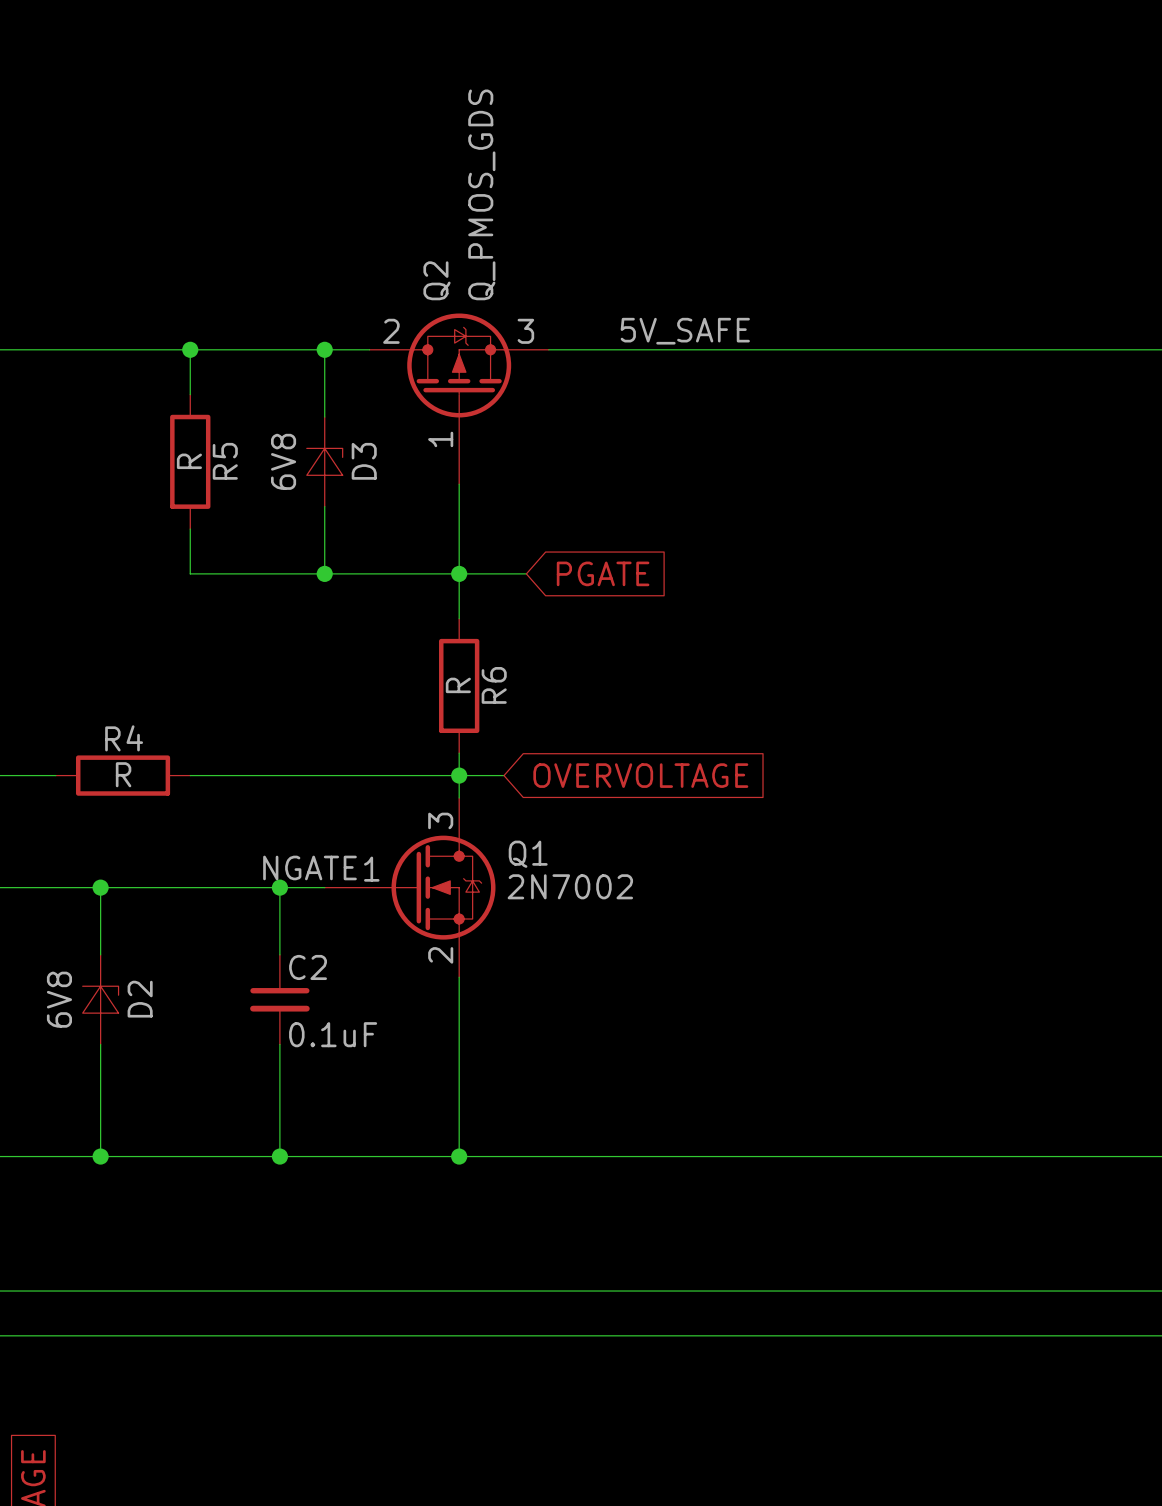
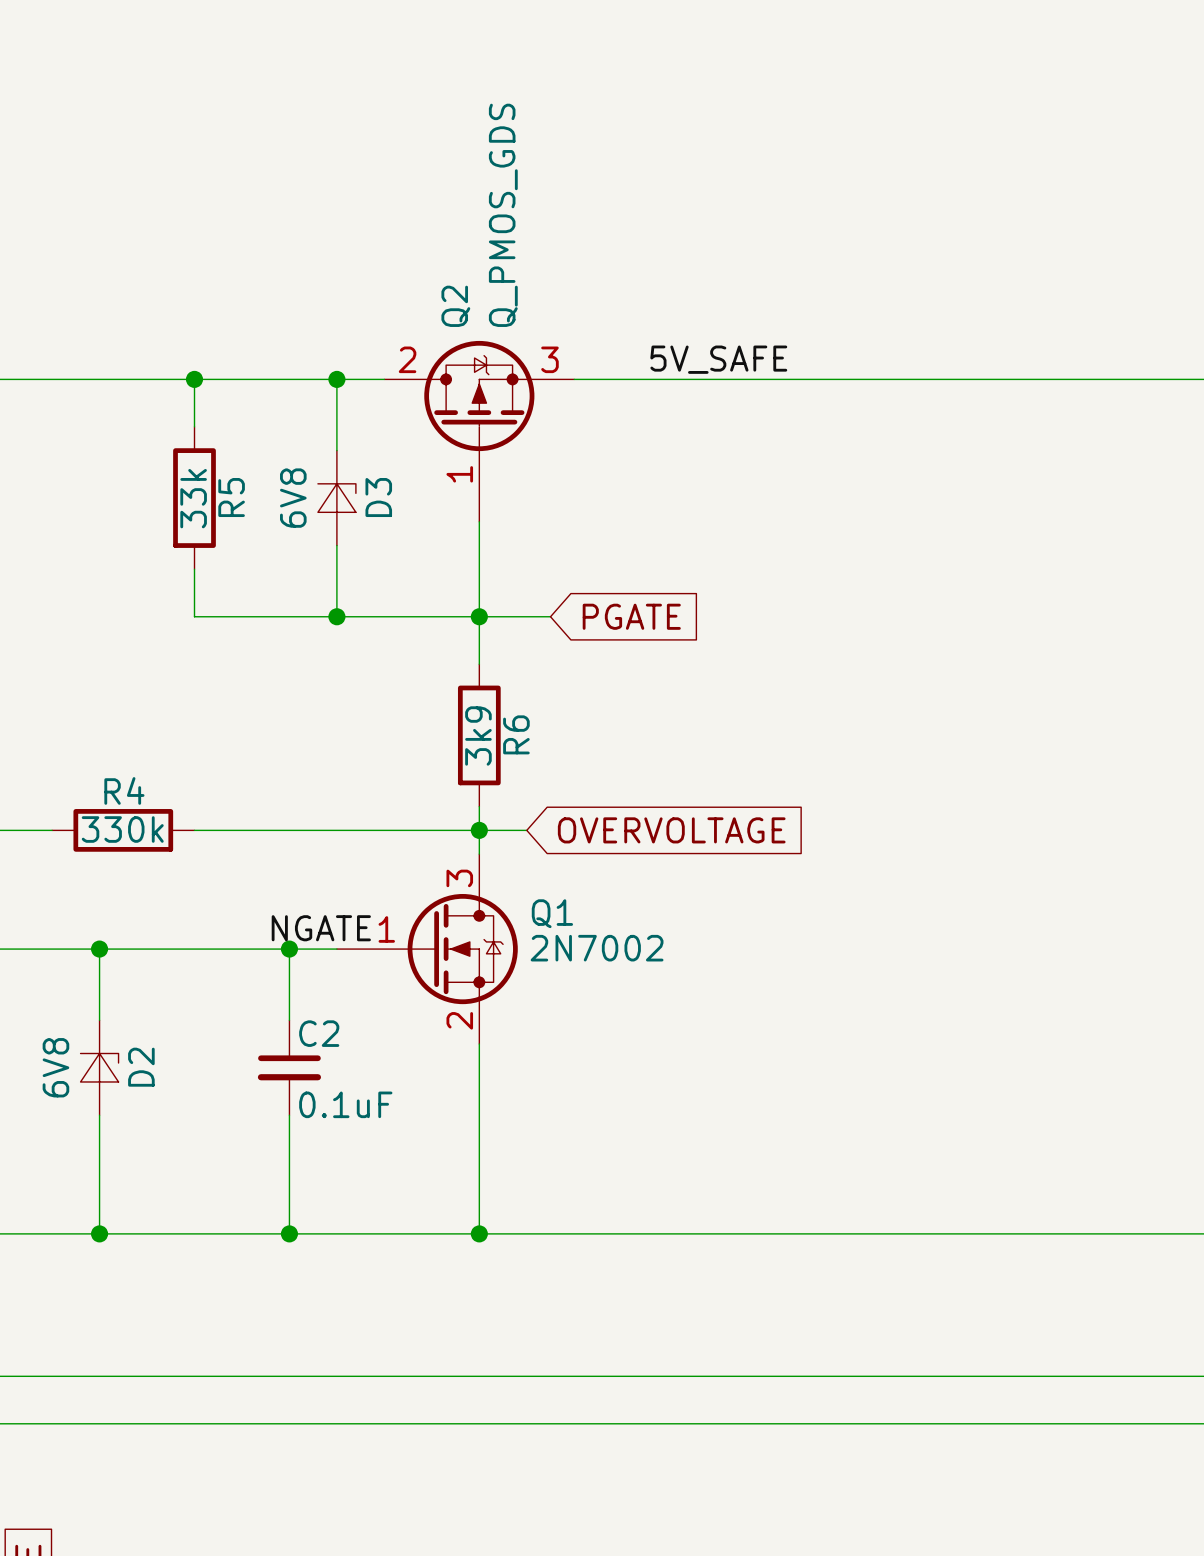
R5 value: R (189, 461) -> 33k (193, 498)
R6 value: R (458, 685) -> 3k9 (478, 736)
R4 value: R (123, 774) -> 330k (122, 829)

